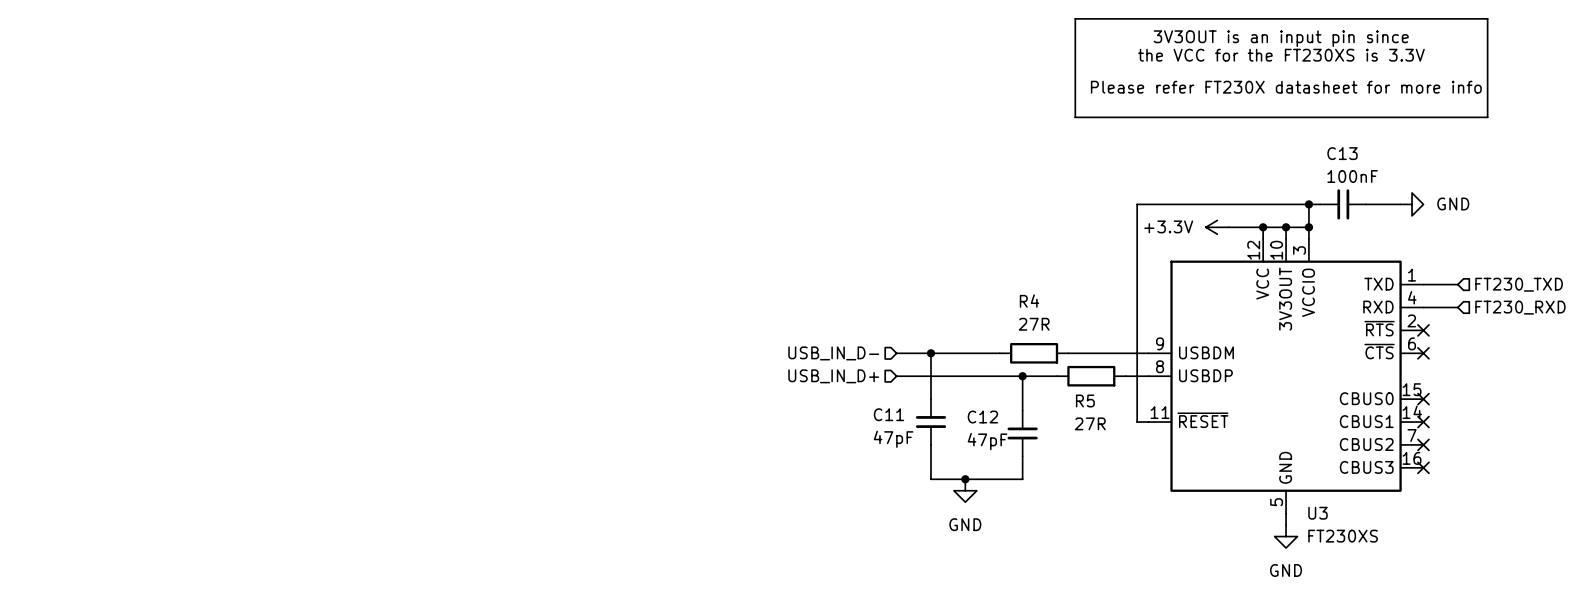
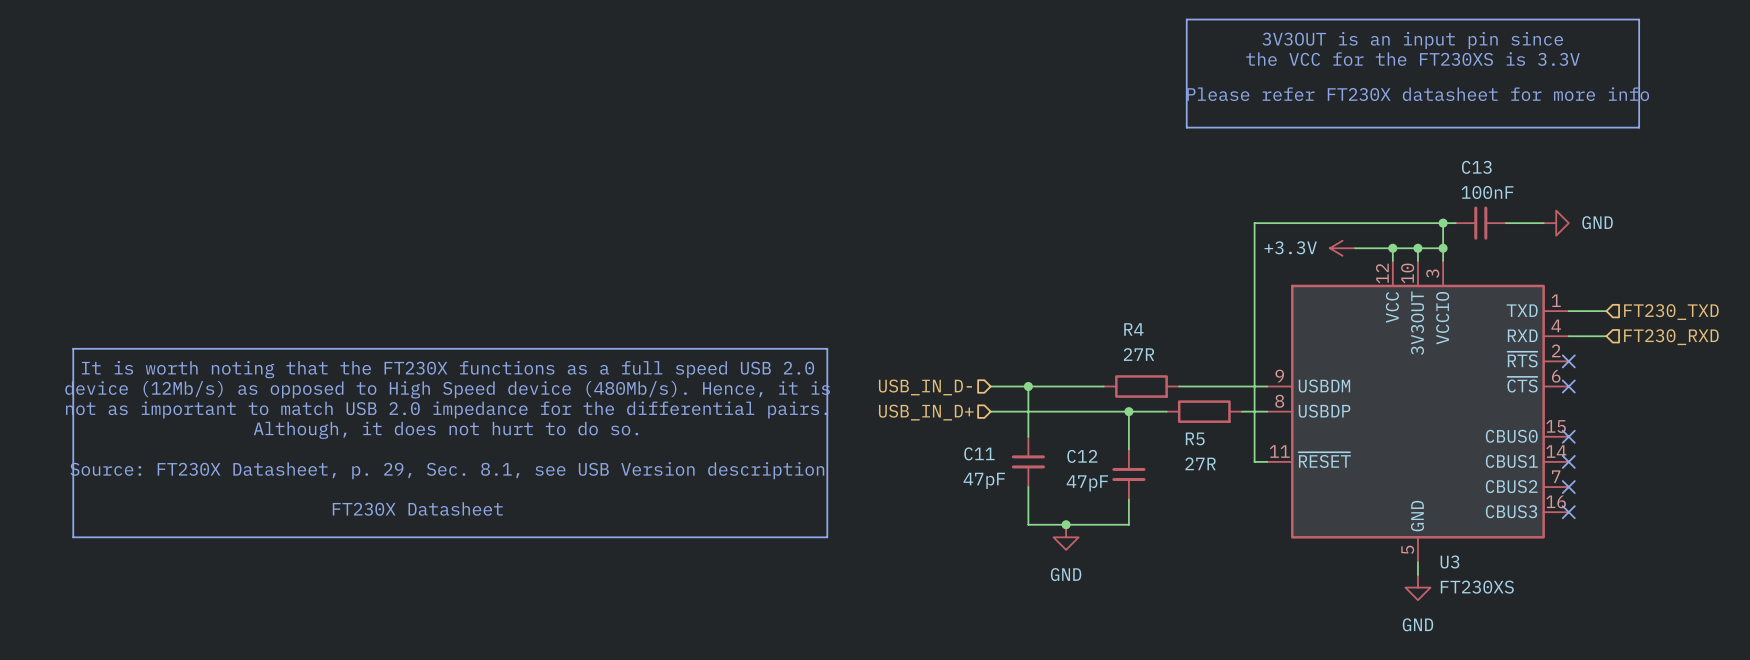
line: none -> (73, 348) (827, 348) (827, 537) (73, 537) (73, 348)
text: none -> It is worth noting that the FT230X functions as a full speed USB 2.0 (448, 369)
text: none -> device (12Mb/s) as opposed to High Speed device (480Mb/s). Hence, it is (447, 389)
text: none -> not as important to match USB 2.0 impedance for the differential pairs. (446, 409)
text: none -> Although, it does not hurt to do so. (446, 430)
text: none -> Source: FT230X Datasheet, p. 29, Sec. 8.1, see USB Version description (447, 470)
text: none -> FT230X Datasheet (417, 508)

